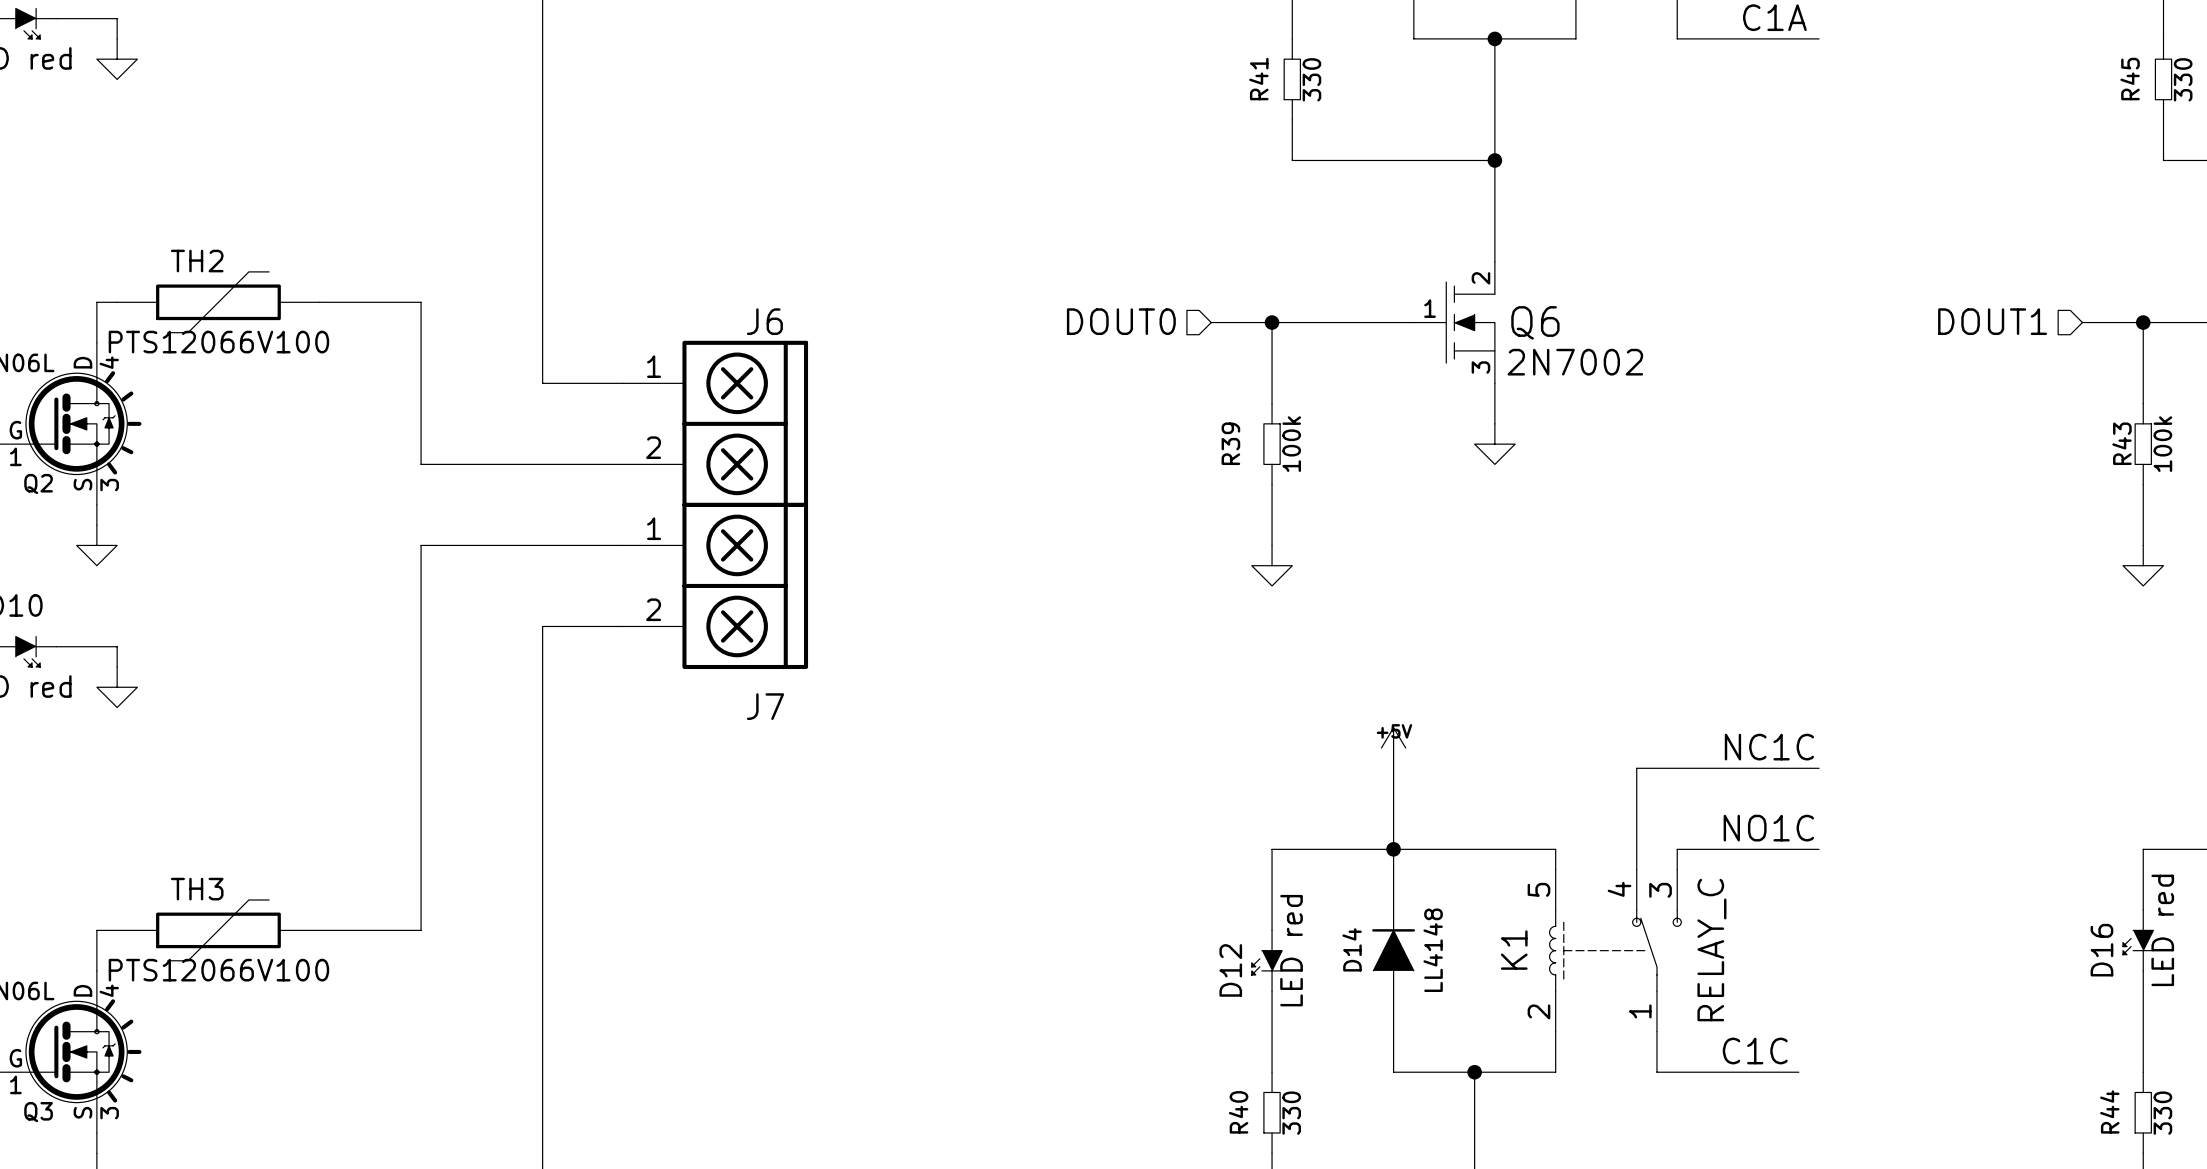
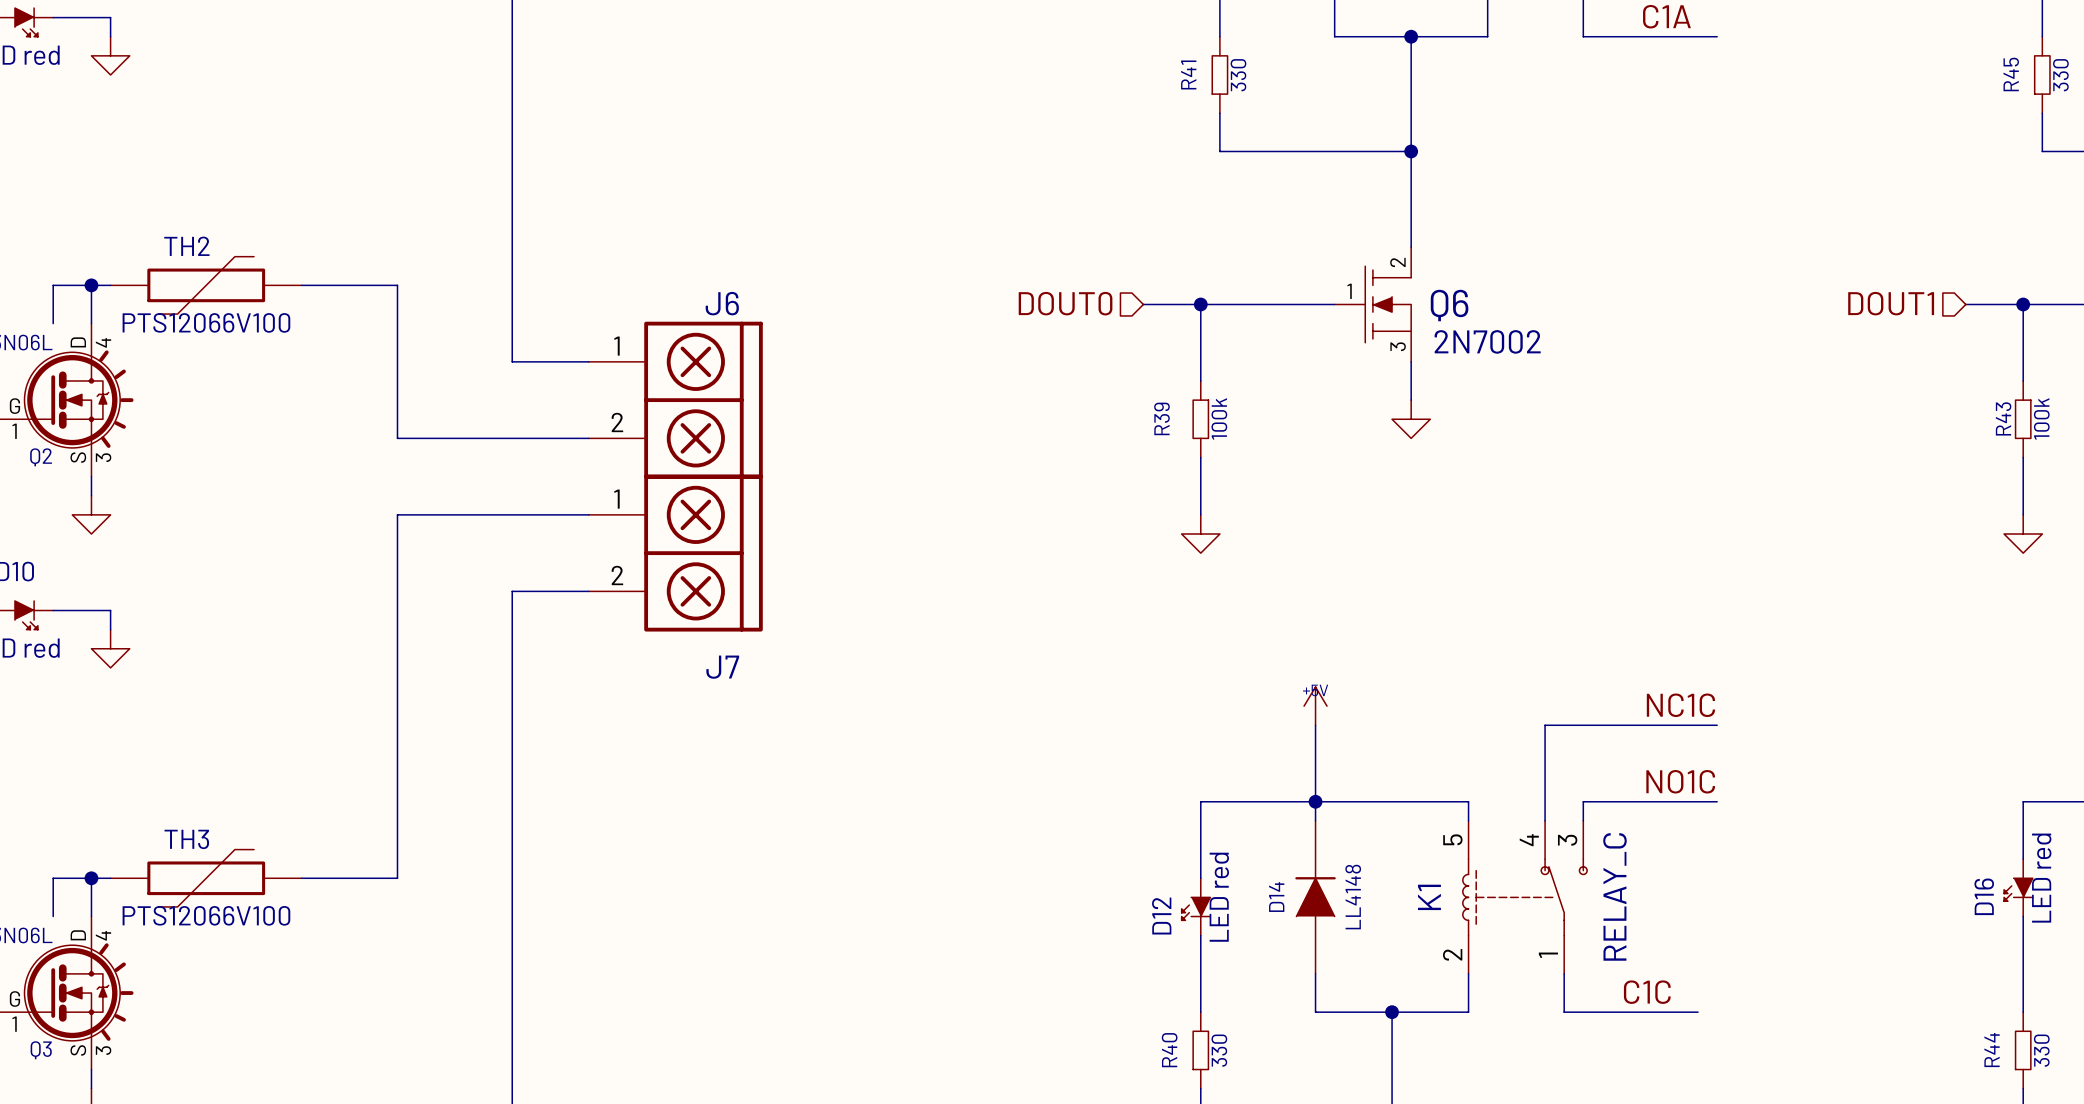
wire: none -> (91, 285) (53, 285) (53, 323)
junction: none -> (91, 285)
wire: none -> (91, 878) (53, 878) (53, 916)
junction: none -> (91, 878)

